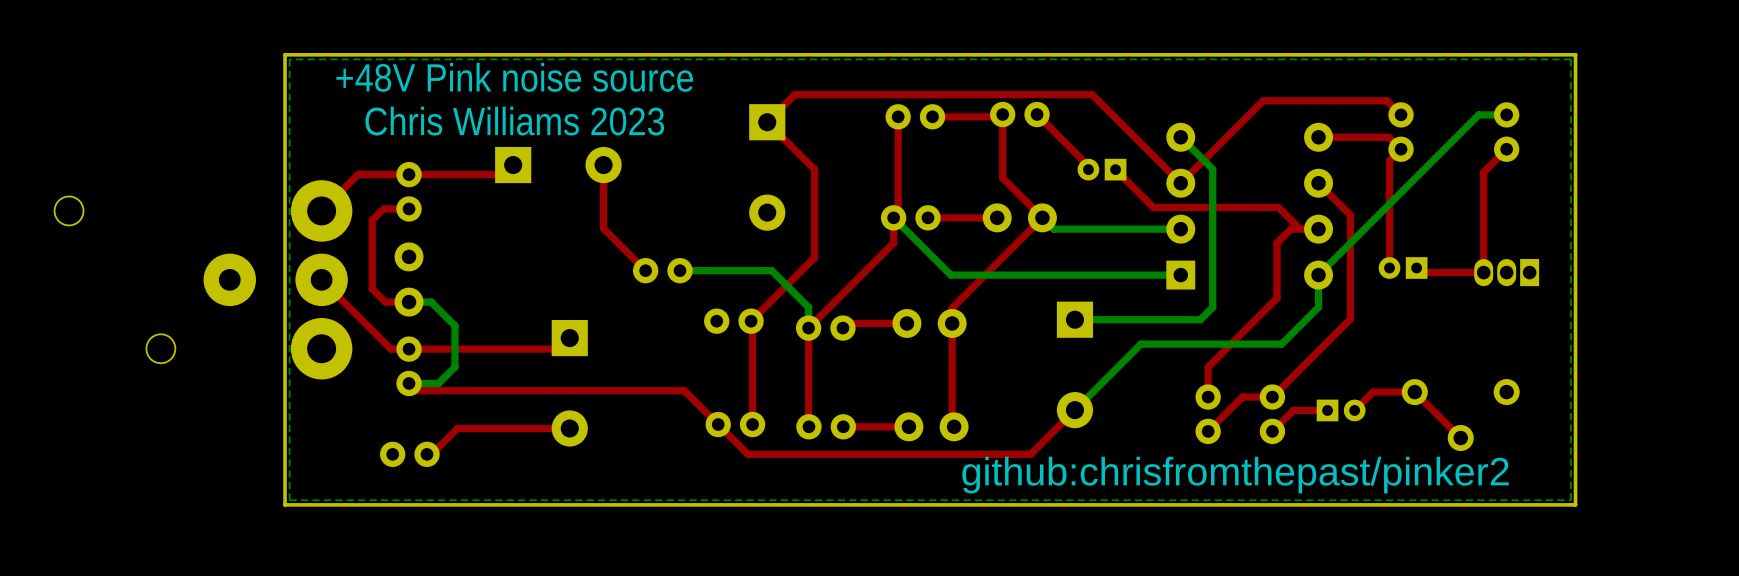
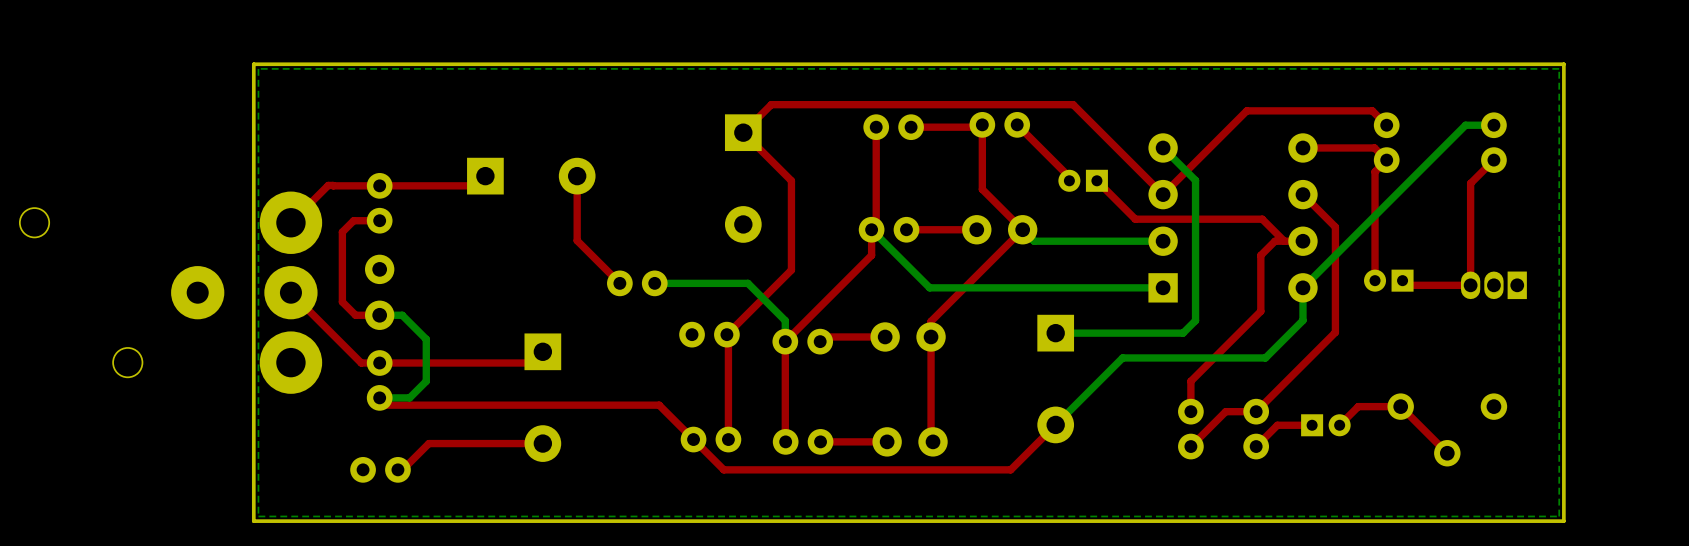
text: +48V Pink noise source (514, 77) -> none
text: Chris Williams 2023 (514, 121) -> none
text: github:chrisfromthepast/pinker2 (1235, 475) -> none

